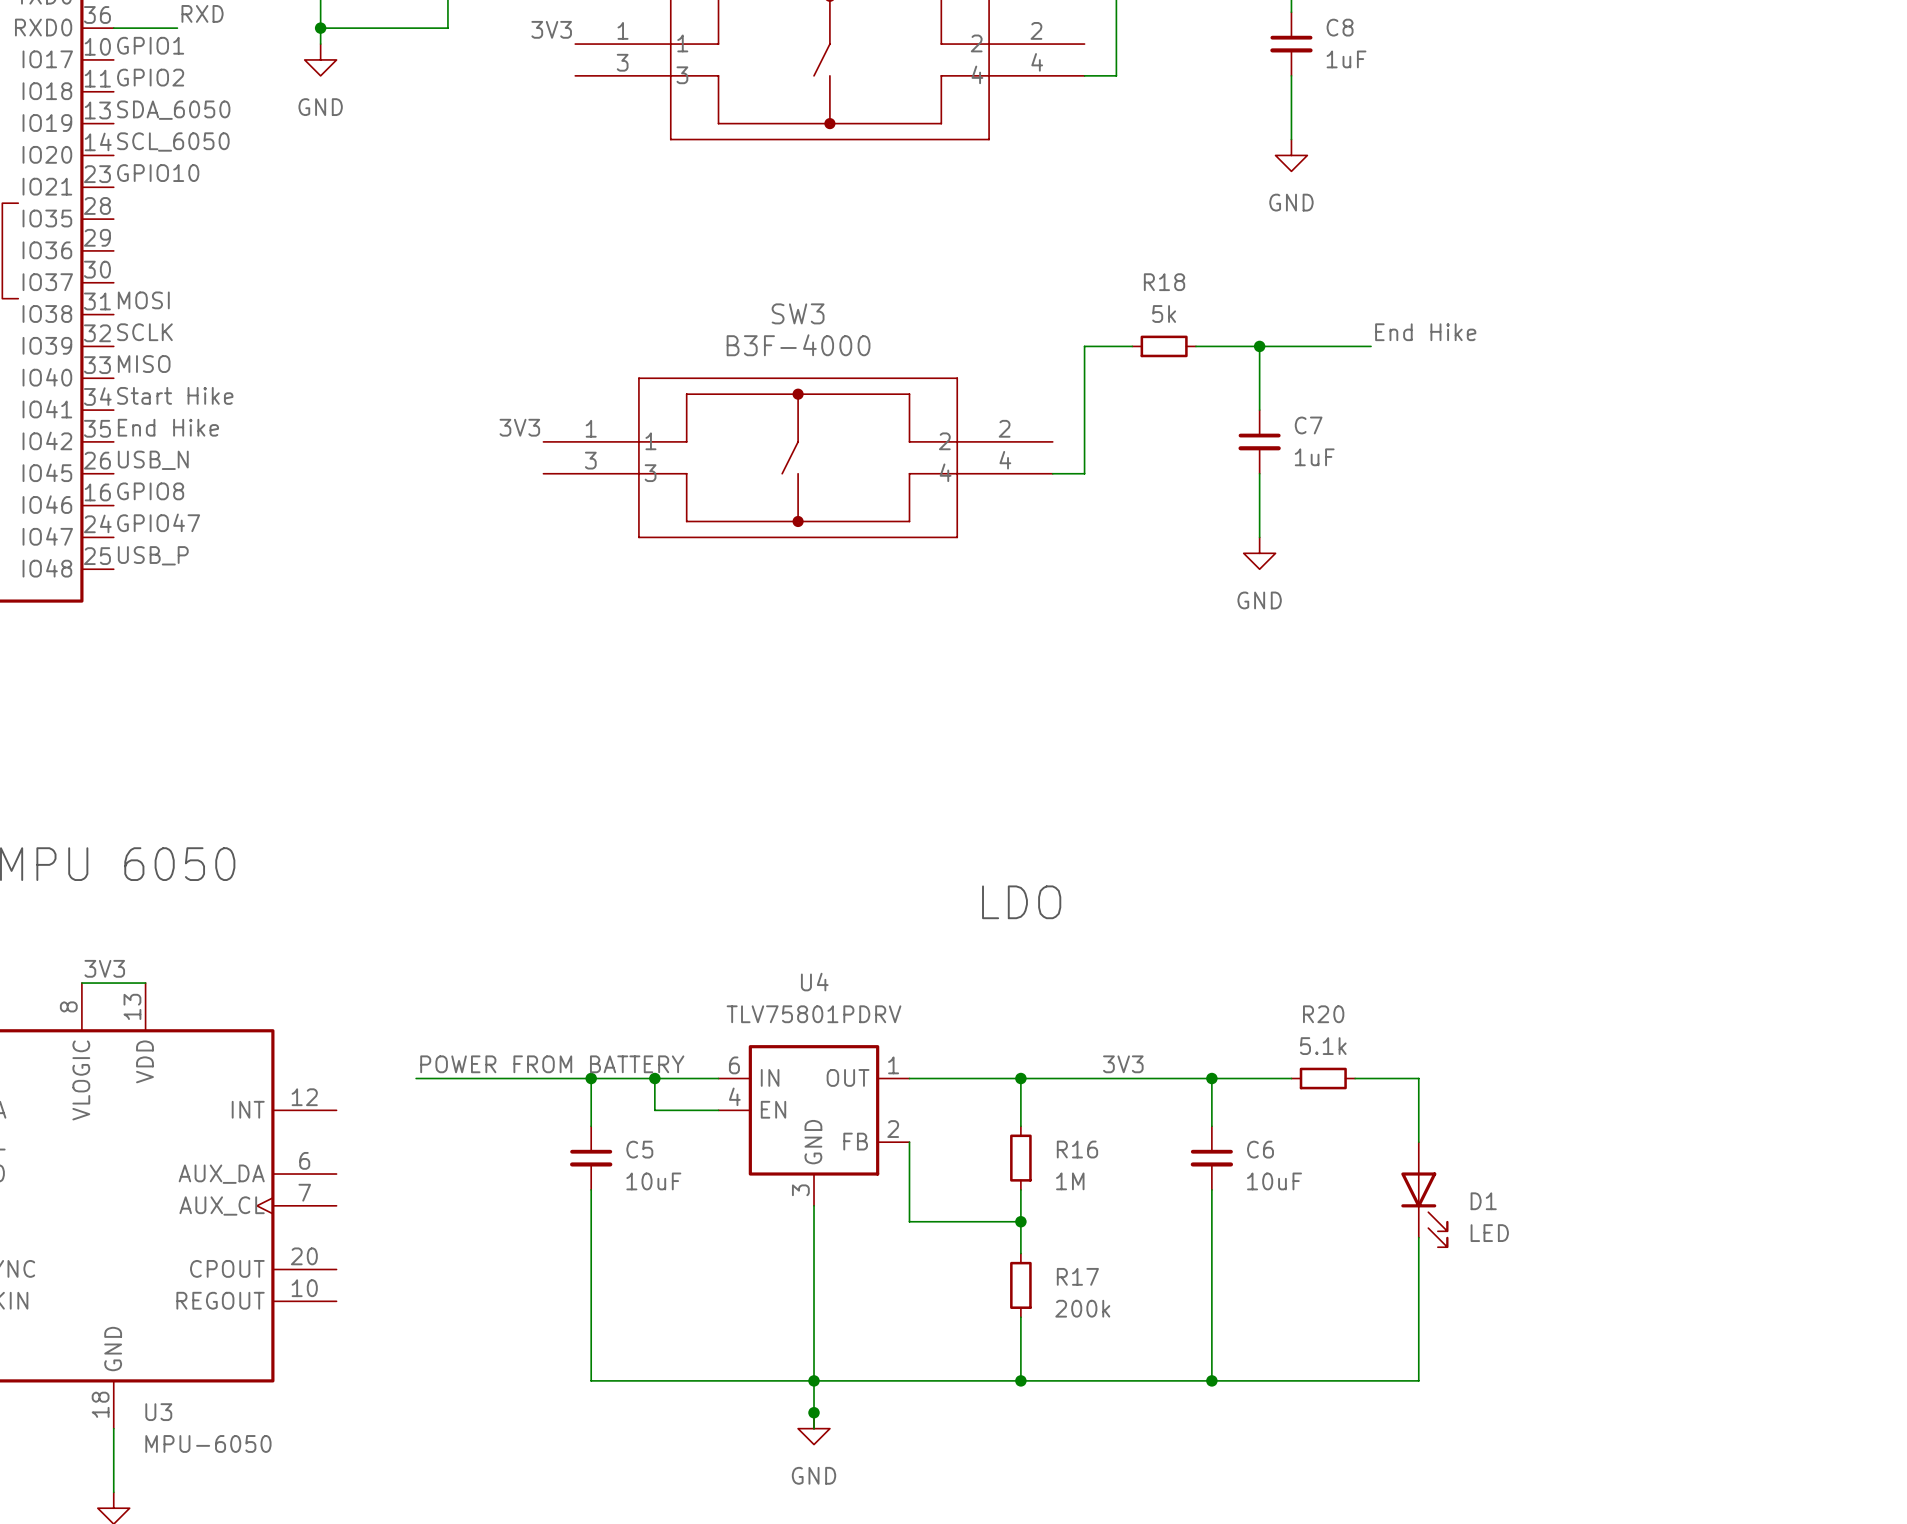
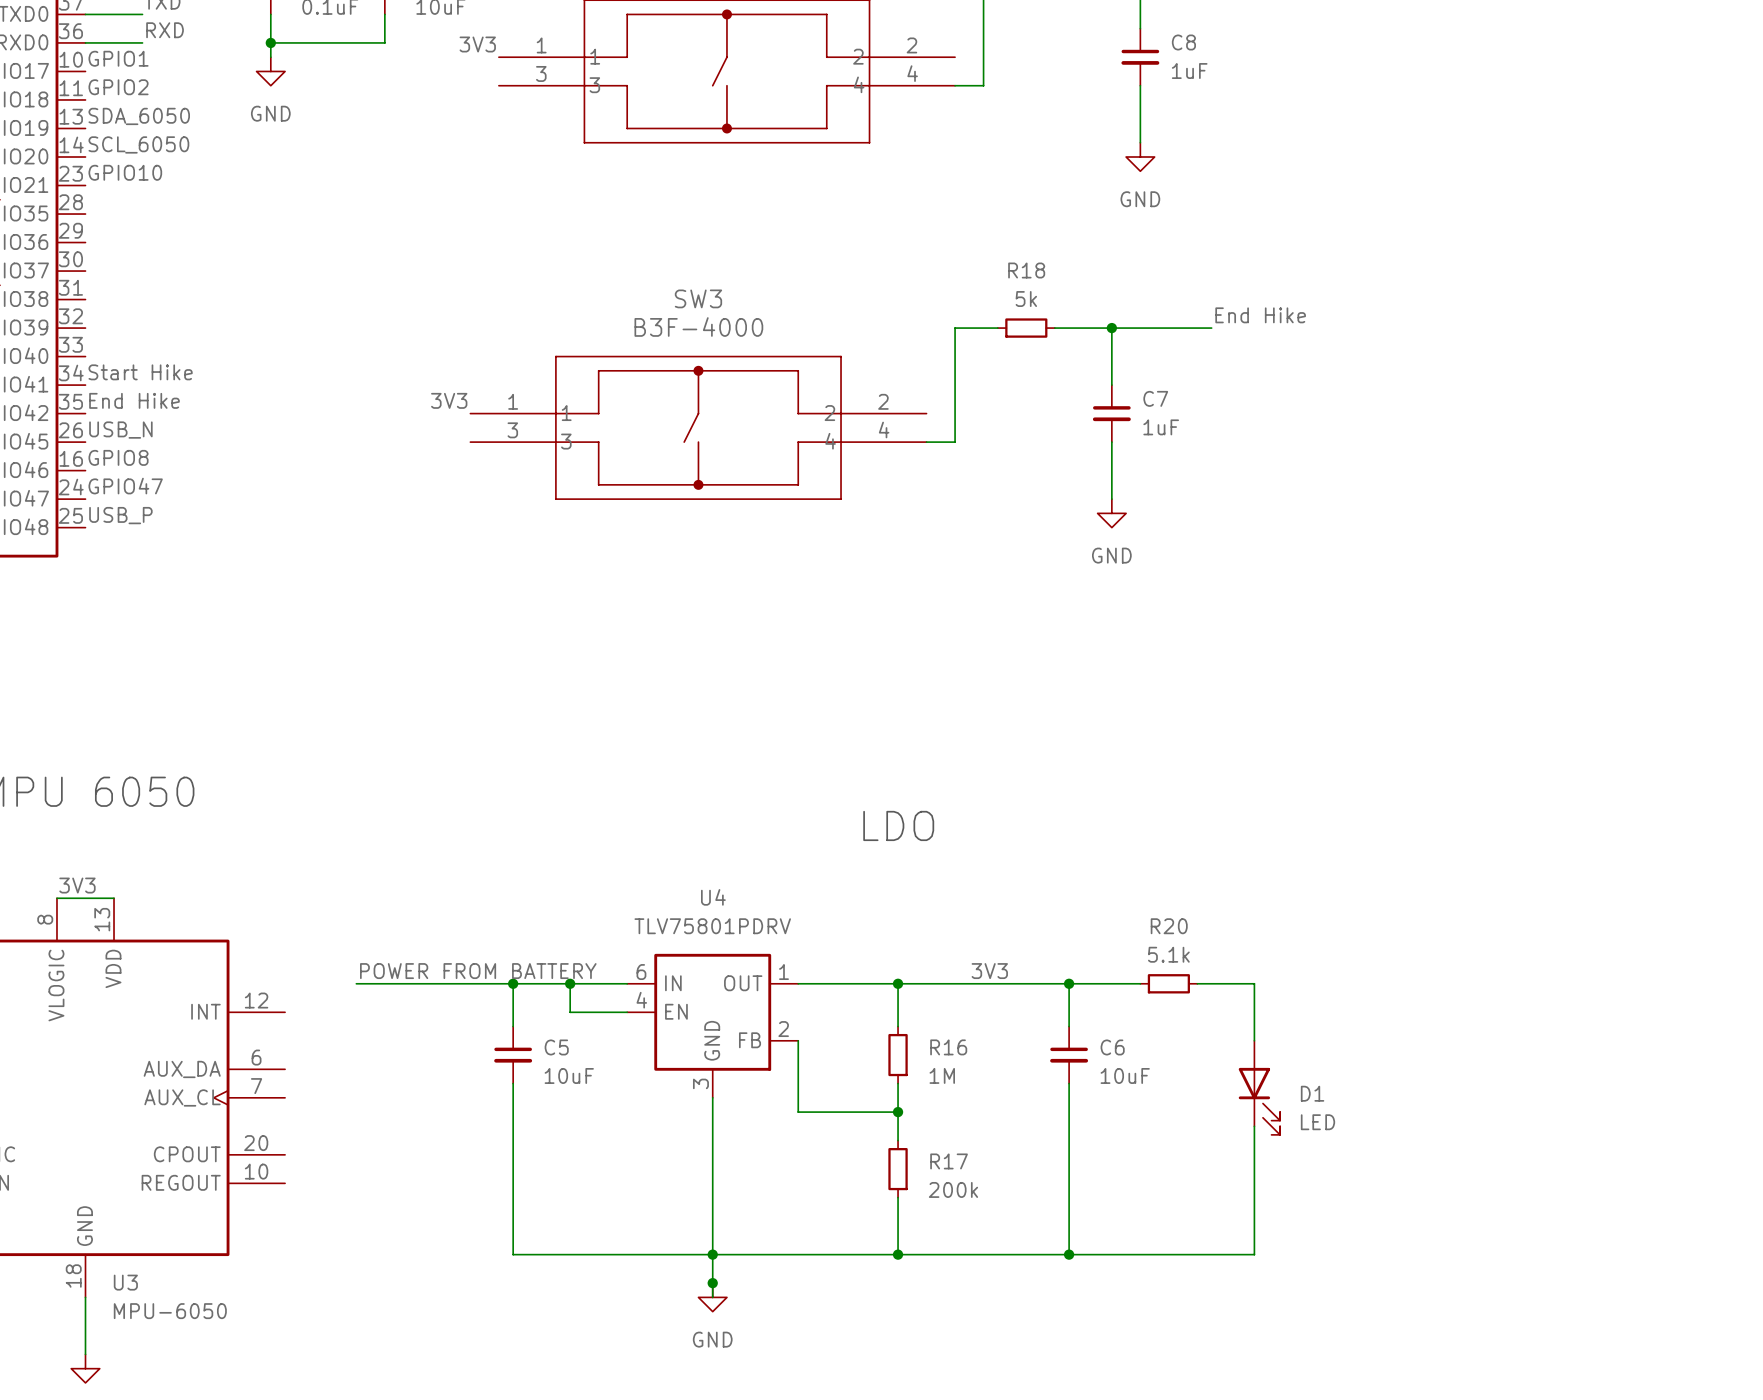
label: MOSI (143, 300) -> none
label: SCLK (144, 332) -> none
label: MISO (144, 364) -> none

